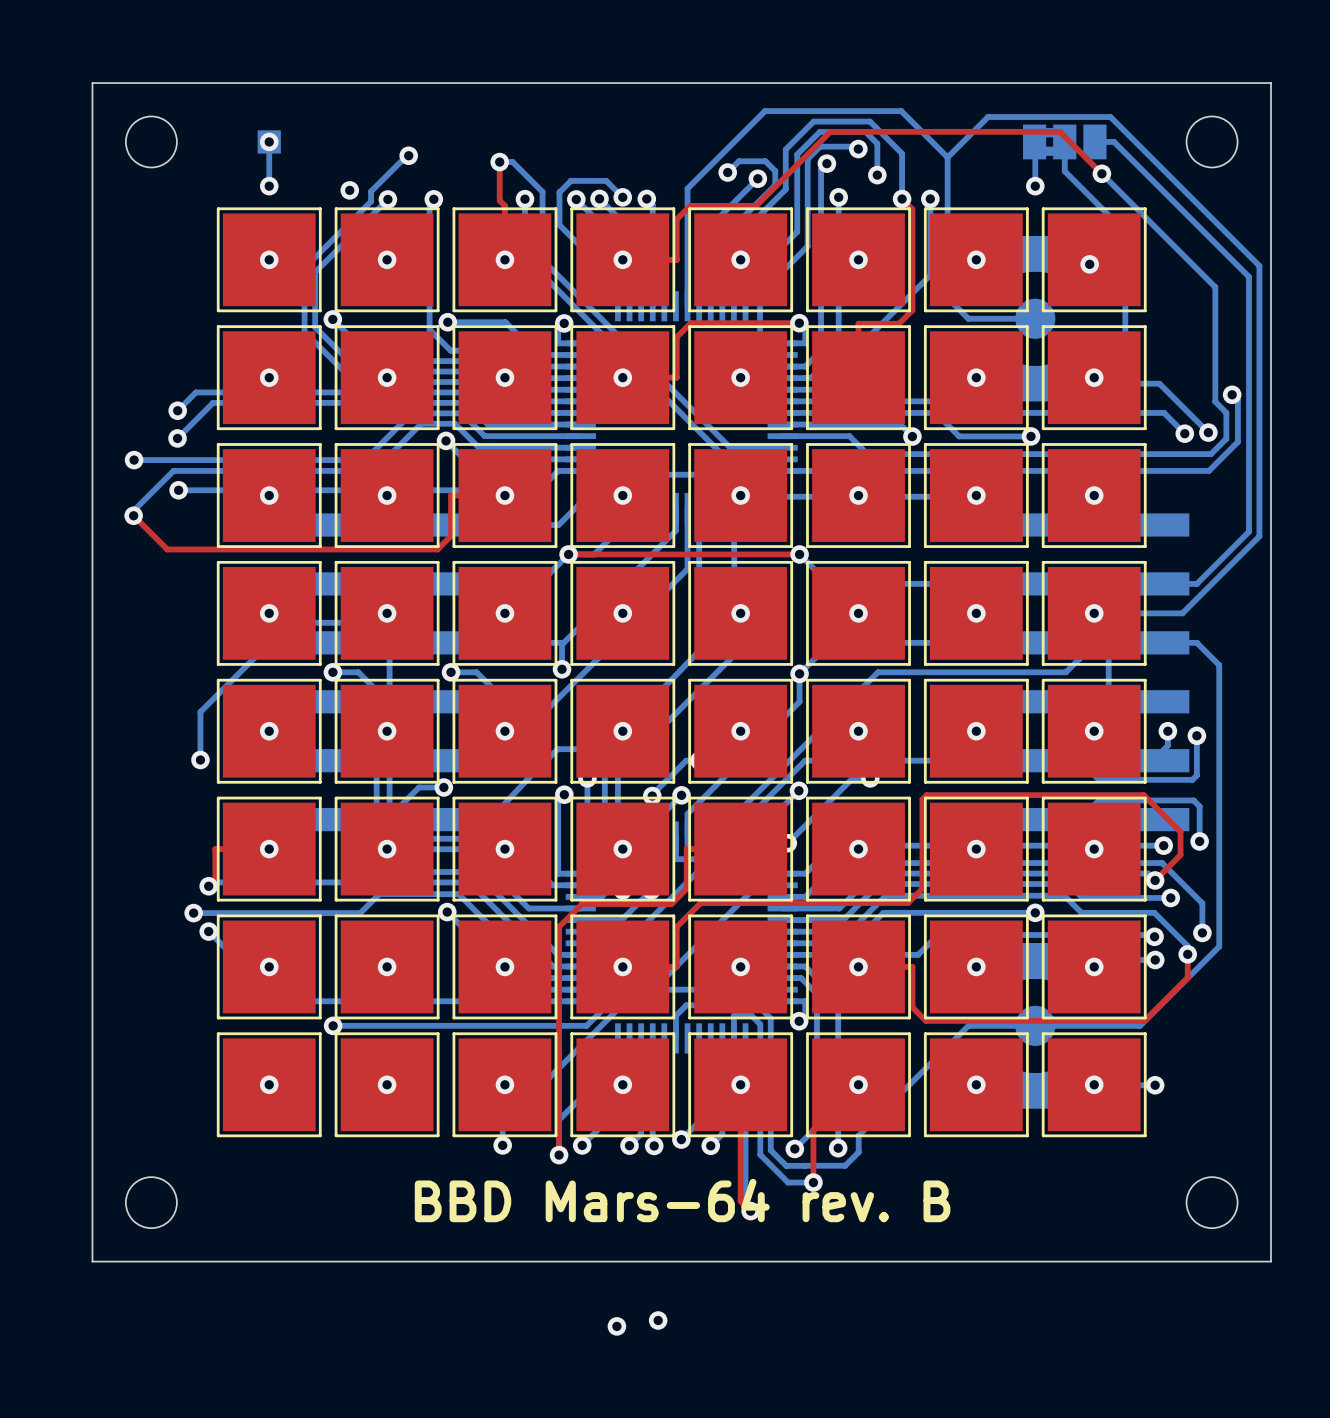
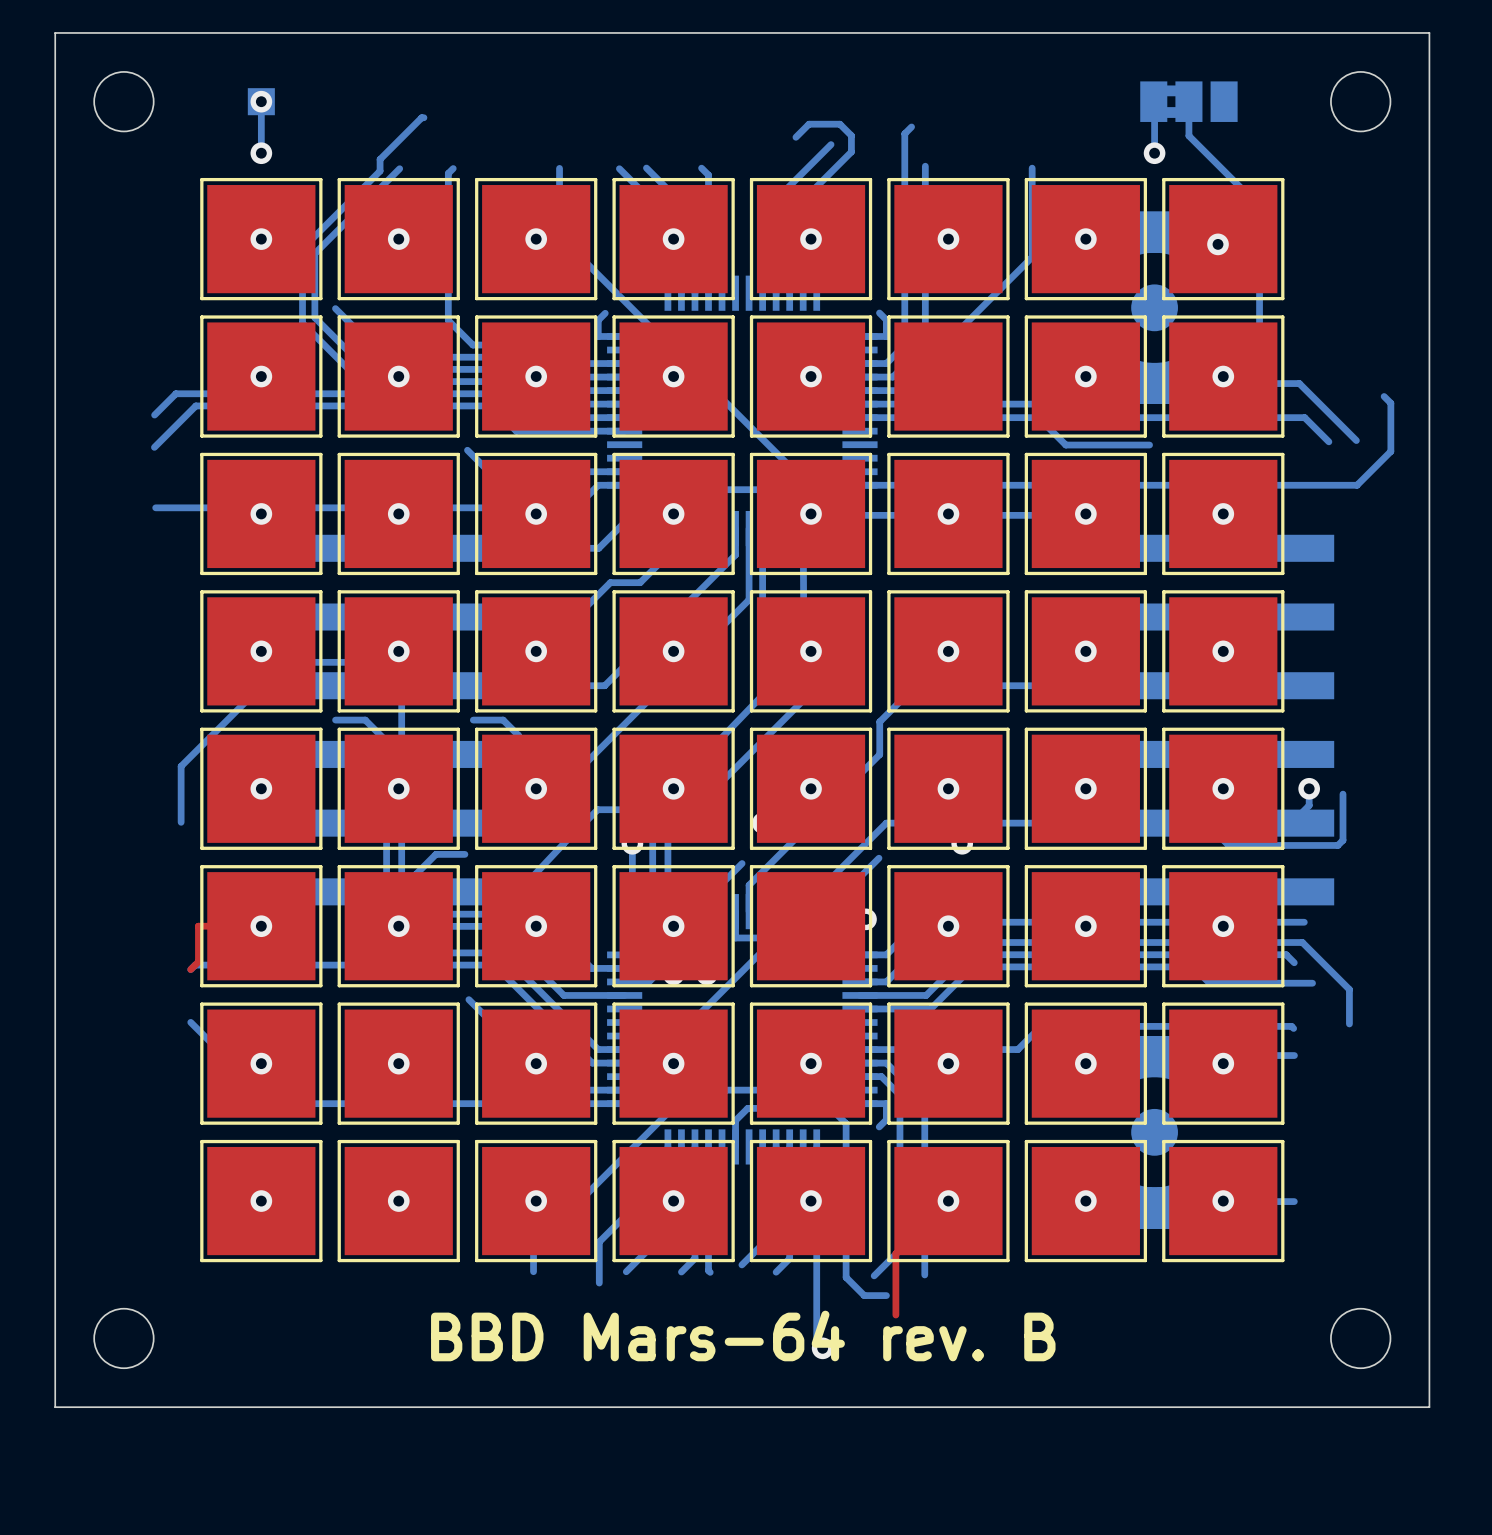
bottom track: (1094, 141) (1114, 141) (1248, 276) (1248, 531) (1196, 583) (829, 583) (799, 554) -> none
bottom track: (858, 149) (855, 146) (820, 146) (807, 159) (807, 246) (760, 294) (760, 354) (782, 354) -> none
via: (858, 149) -> none
via: (408, 155) -> none
bottom track: (947, 157) (988, 117) (1110, 117) (1259, 265) (1259, 536) (1182, 613) (1123, 613) (1108, 627) (1108, 701) (1152, 701) -> none
bottom track: (947, 157) (901, 111) (765, 111) (687, 188) (687, 306) -> none
bottom track: (947, 157) (947, 228) (944, 232) (944, 294) (968, 318) (1035, 318) -> none
bottom track: (499, 162) (512, 162) (542, 191) (542, 260) (730, 447) (782, 447) -> none
top track: (499, 162) (499, 200) (504, 205) (504, 259) -> none
via: (499, 162) -> none
via: (826, 163) -> none
via: (727, 172) -> none
bottom track: (1101, 173) (1215, 287) (1215, 401) (1226, 412) (1226, 438) (1211, 454) (867, 454) (849, 436) (782, 436) -> none
top track: (1101, 173) (1059, 131) (830, 131) (756, 205) (690, 205) (676, 219) (676, 259) (622, 259) -> none
via: (1101, 173) -> none
bottom track: (877, 175) (877, 143) (865, 132) (819, 132) (797, 154) (797, 231) (745, 283) (745, 306) -> none
via: (877, 175) -> none
via: (757, 178) -> none
via: (349, 190) -> none
bottom track: (622, 197) (606, 180) (570, 180) (559, 192) (559, 225) (617, 283) (617, 306) -> none
via: (622, 197) -> none
via: (838, 197) -> none
via: (599, 198) -> none
via: (646, 198) -> none
via: (930, 198) -> none
via: (387, 199) -> none
via: (433, 199) -> none
via: (524, 199) -> none
via: (576, 199) -> none
bottom track: (902, 199) (902, 153) (870, 121) (813, 121) (785, 149) (785, 189) (733, 241) (733, 306) -> none
top track: (902, 199) (912, 209) (912, 310) (898, 323) (858, 323) (858, 377) -> none
via: (902, 199) -> none
via: (332, 319) -> none
bottom track: (447, 322) (505, 322) (538, 354) (580, 354) -> none
via: (447, 322) -> none
via: (564, 323) -> none
top track: (799, 323) (690, 323) (676, 337) (676, 377) (622, 377) -> none
via: (799, 323) -> none
via: (1232, 394) -> none
via: (177, 410) -> none
bottom track: (782, 424) (900, 424) (912, 436) -> none
via: (1208, 432) -> none
via: (1184, 433) -> none
bottom track: (580, 436) (484, 436) (461, 413) (411, 413) (364, 460) (134, 460) -> none
via: (912, 436) -> none
via: (1031, 436) -> none
via: (177, 438) -> none
via: (446, 440) -> none
bottom track: (580, 447) (478, 447) (455, 423) (421, 423) (374, 470) (173, 470) (133, 510) (133, 515) -> none
via: (134, 460) -> none
via: (178, 490) -> none
top track: (504, 495) (451, 495) (451, 535) (437, 549) (167, 549) (133, 515) -> none
via: (133, 515) -> none
top track: (568, 554) (799, 554) -> none
via: (568, 554) -> none
via: (799, 554) -> none
bottom track: (1079, 583) (1079, 658) (1065, 672) (878, 672) (745, 804) (745, 836) (733, 836) -> none
bottom track: (562, 642) (562, 669) -> none
bottom track: (1152, 642) (1196, 642) (1219, 665) (1219, 946) (1140, 1025) (968, 1025) (858, 1135) (858, 1152) (845, 1165) (805, 1165) -> none
via: (562, 669) -> none
via: (332, 672) -> none
via: (451, 672) -> none
via: (799, 673) -> none
via: (1196, 735) -> none
via: (200, 760) -> none
bottom track: (699, 760) (686, 760) (652, 796) -> none
bottom track: (870, 778) (852, 778) (787, 843) -> none
via: (443, 787) -> none
via: (798, 790) -> none
bottom track: (564, 794) (558, 800) (558, 873) (580, 873) -> none
via: (564, 794) -> none
via: (681, 795) -> none
via: (652, 796) -> none
bottom track: (1035, 819) (1079, 819) (1098, 800) (1193, 800) (1199, 806) (1199, 841) -> none
via: (1199, 841) -> none
via: (1163, 845) -> none
top track: (740, 849) (686, 849) (686, 888) (671, 904) (582, 904) (559, 926) (559, 1155) -> none
top track: (1155, 880) (1180, 855) (1180, 831) (1143, 795) (926, 795) (922, 799) (922, 888) (908, 903) (700, 903) (676, 927) (676, 966) (622, 966) -> none
via: (1155, 880) -> none
bottom track: (782, 885) (757, 885) (646, 996) (616, 996) (586, 1025) (333, 1025) -> none
via: (208, 886) -> none
bottom track: (651, 890) (621, 920) (580, 920) -> none
via: (1170, 897) -> none
via: (447, 912) -> none
bottom track: (1035, 912) (883, 912) (852, 943) (782, 943) -> none
via: (1035, 912) -> none
bottom track: (193, 913) (360, 913) (379, 894) (458, 894) (542, 978) (580, 978) -> none
via: (193, 913) -> none
via: (208, 931) -> none
bottom track: (782, 931) (849, 931) (885, 895) (1064, 895) (1081, 912) (1154, 912) (1187, 946) (1187, 954) -> none
via: (1202, 932) -> none
via: (1154, 936) -> none
top track: (1187, 954) (1187, 977) (1144, 1020) (925, 1020) (912, 1007) (912, 966) (858, 966) -> none
via: (1187, 954) -> none
via: (1155, 960) -> none
via: (799, 1021) -> none
via: (333, 1025) -> none
bottom track: (733, 1038) (733, 1015) (751, 1015) (760, 1024) (760, 1154) (788, 1182) (813, 1182) -> none
top track: (740, 1084) (740, 1201) (750, 1211) -> none
via: (1155, 1085) -> none
via: (681, 1139) -> none
via: (502, 1145) -> none
via: (582, 1145) -> none
via: (629, 1145) -> none
via: (654, 1145) -> none
via: (710, 1145) -> none
via: (794, 1148) -> none
via: (838, 1148) -> none
via: (559, 1155) -> none
via: (813, 1182) -> none
via: (658, 1320) -> none
via: (616, 1326) -> none

